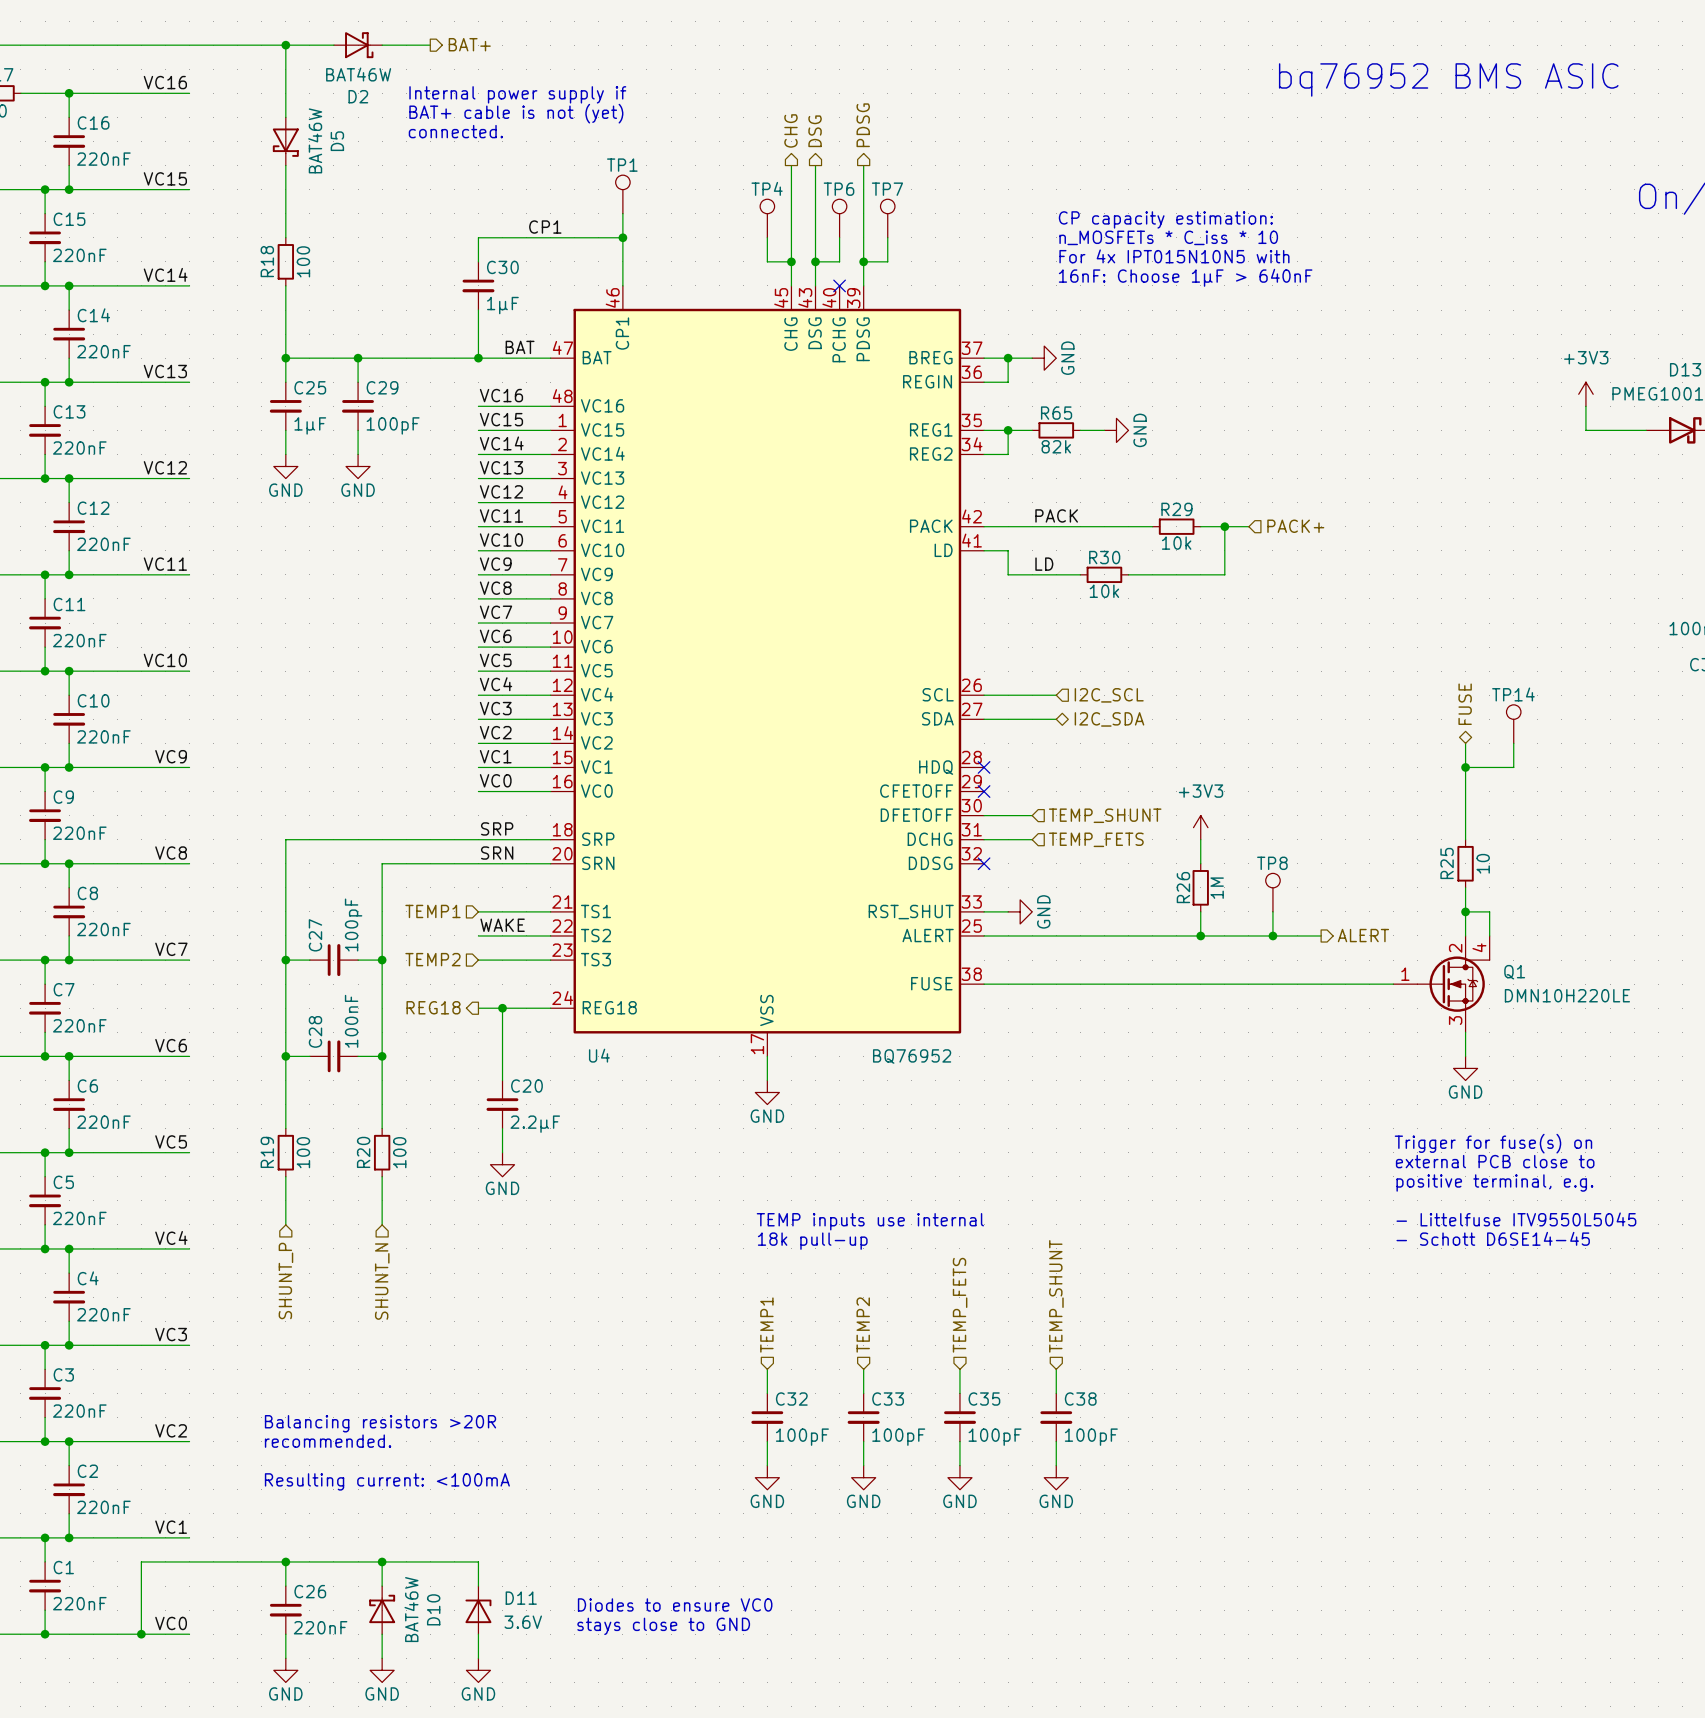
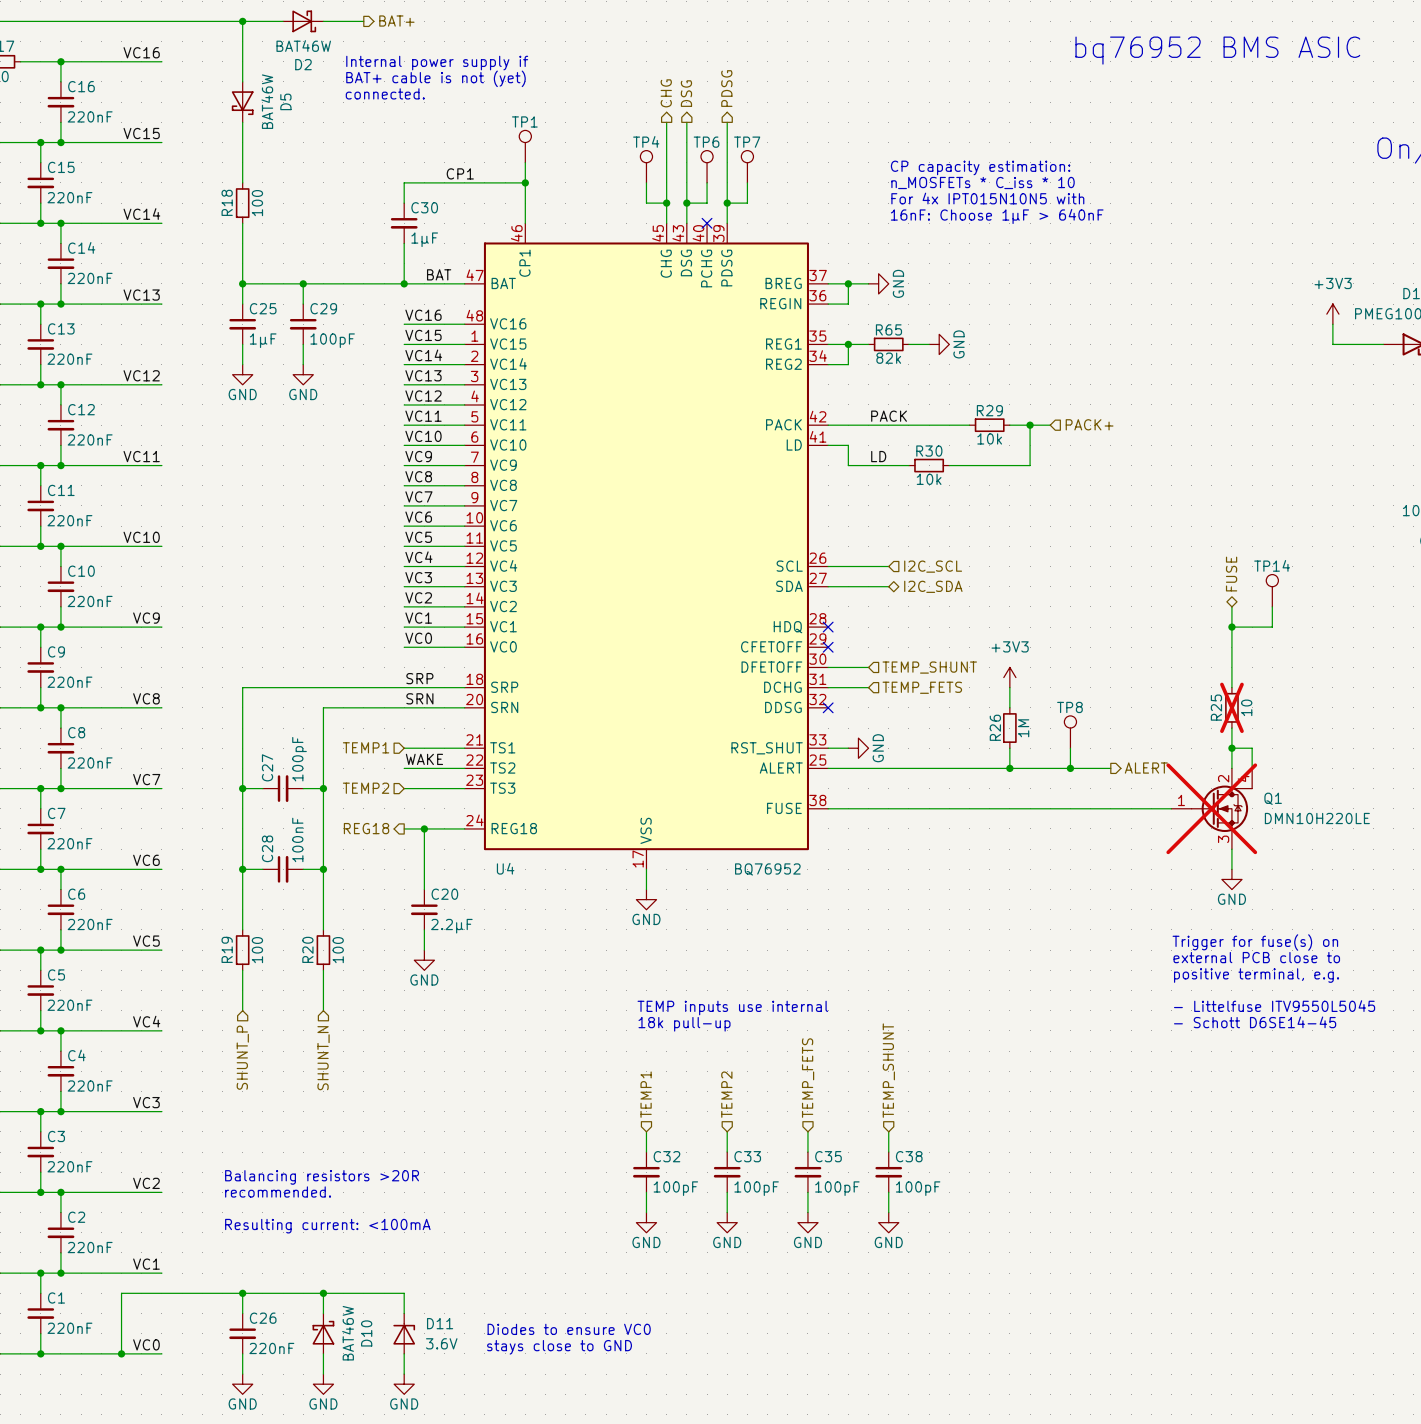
R25 do-not-place cross: none -> (1231, 707)
Q1 do-not-place cross: none -> (1211, 808)

